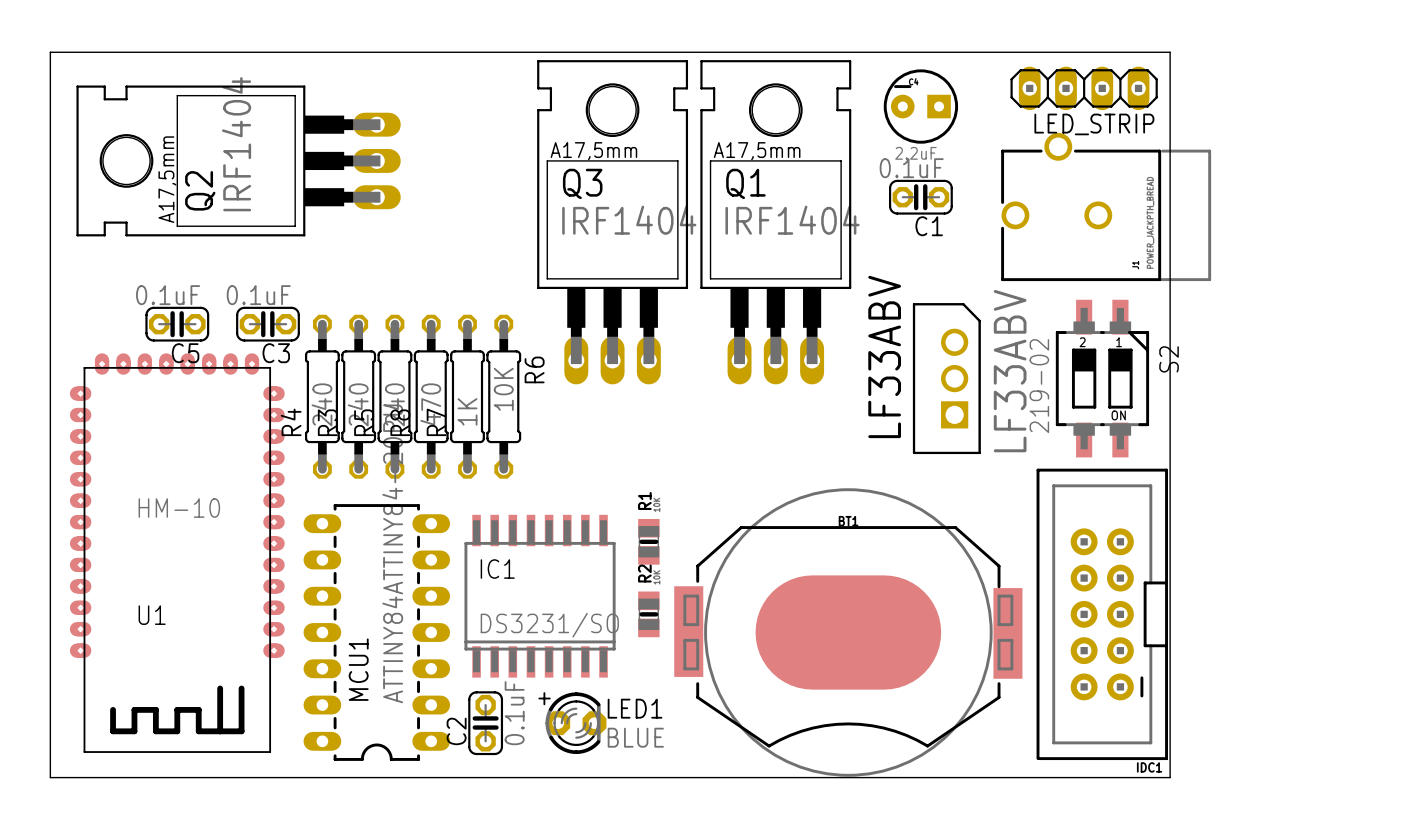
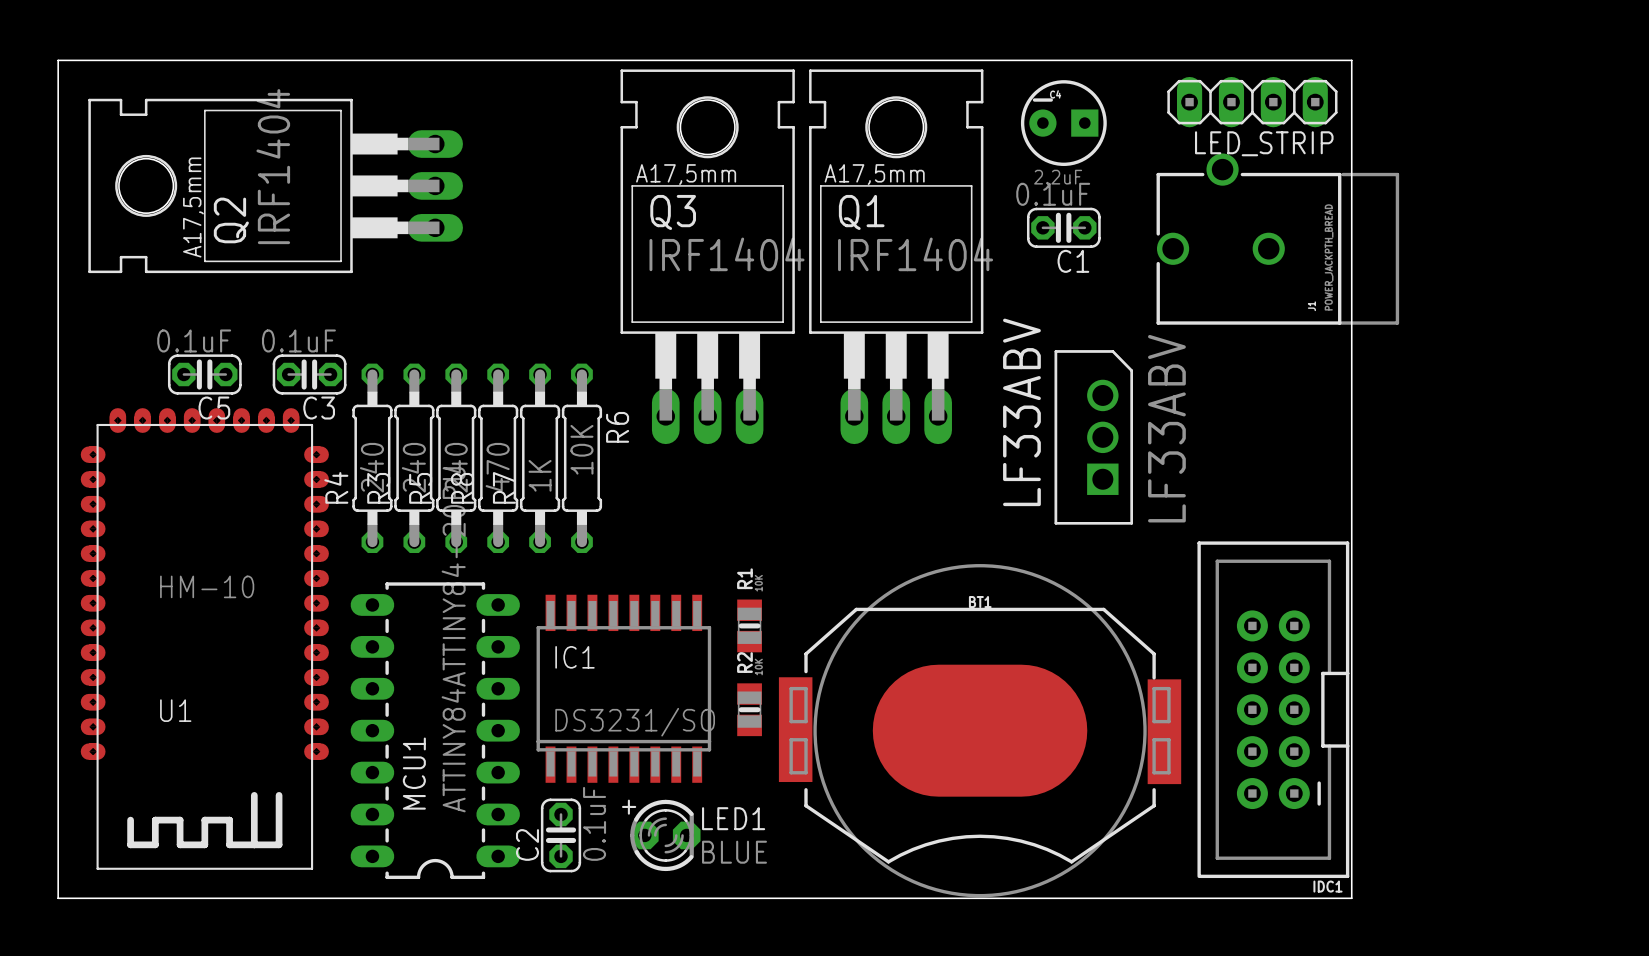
S2: 219-02 (1102, 378) -> none

